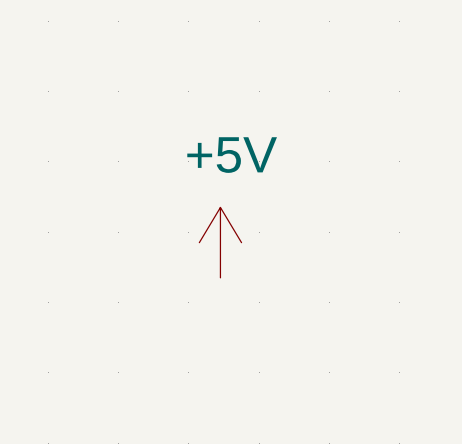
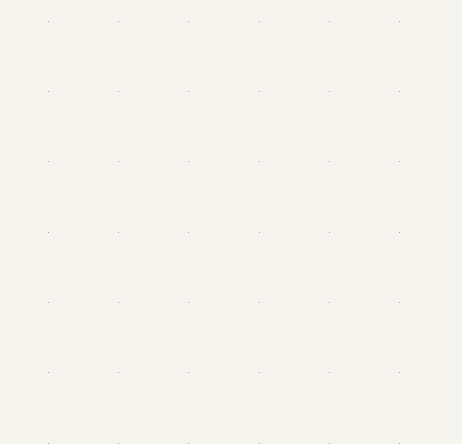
power symbol: +5V (220, 242) -> none

